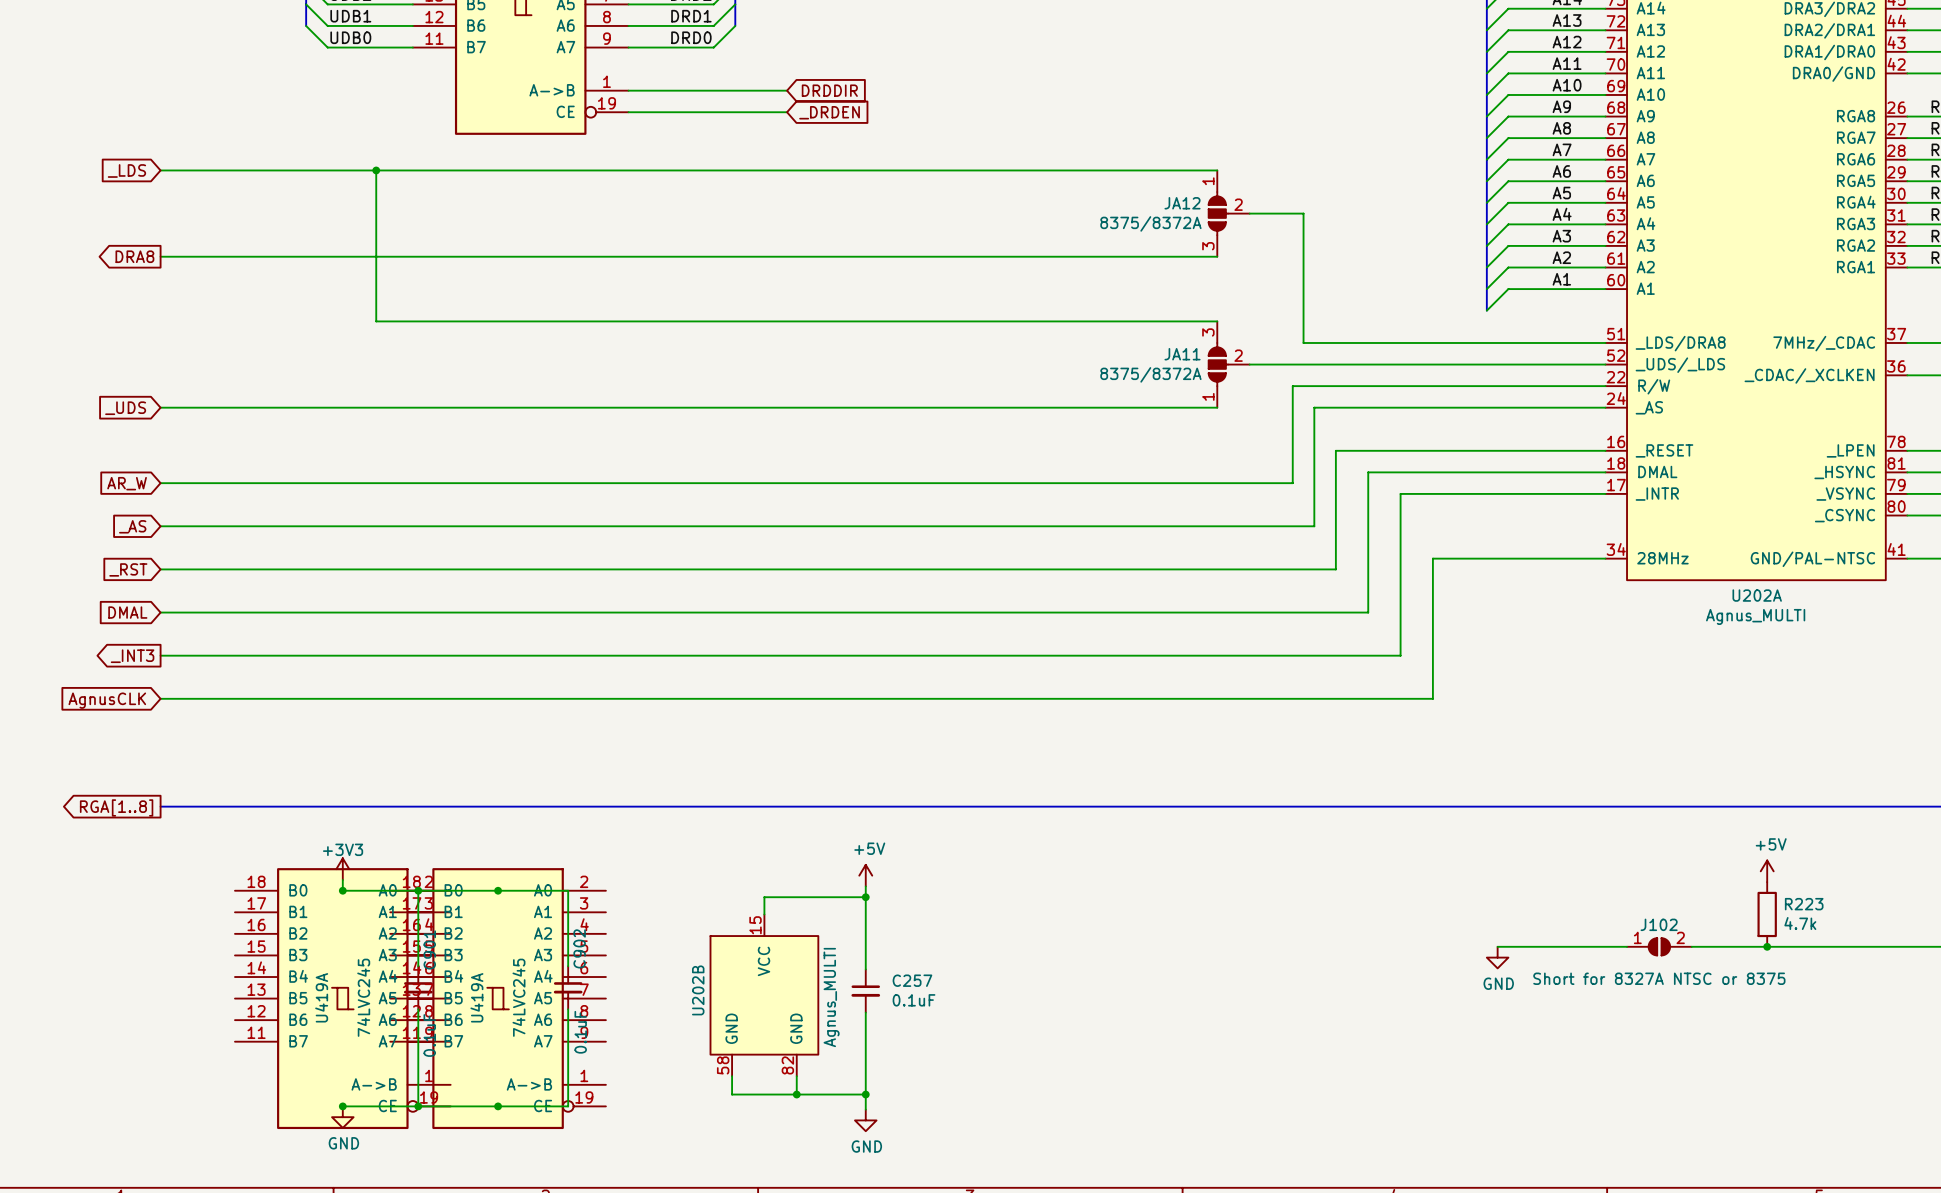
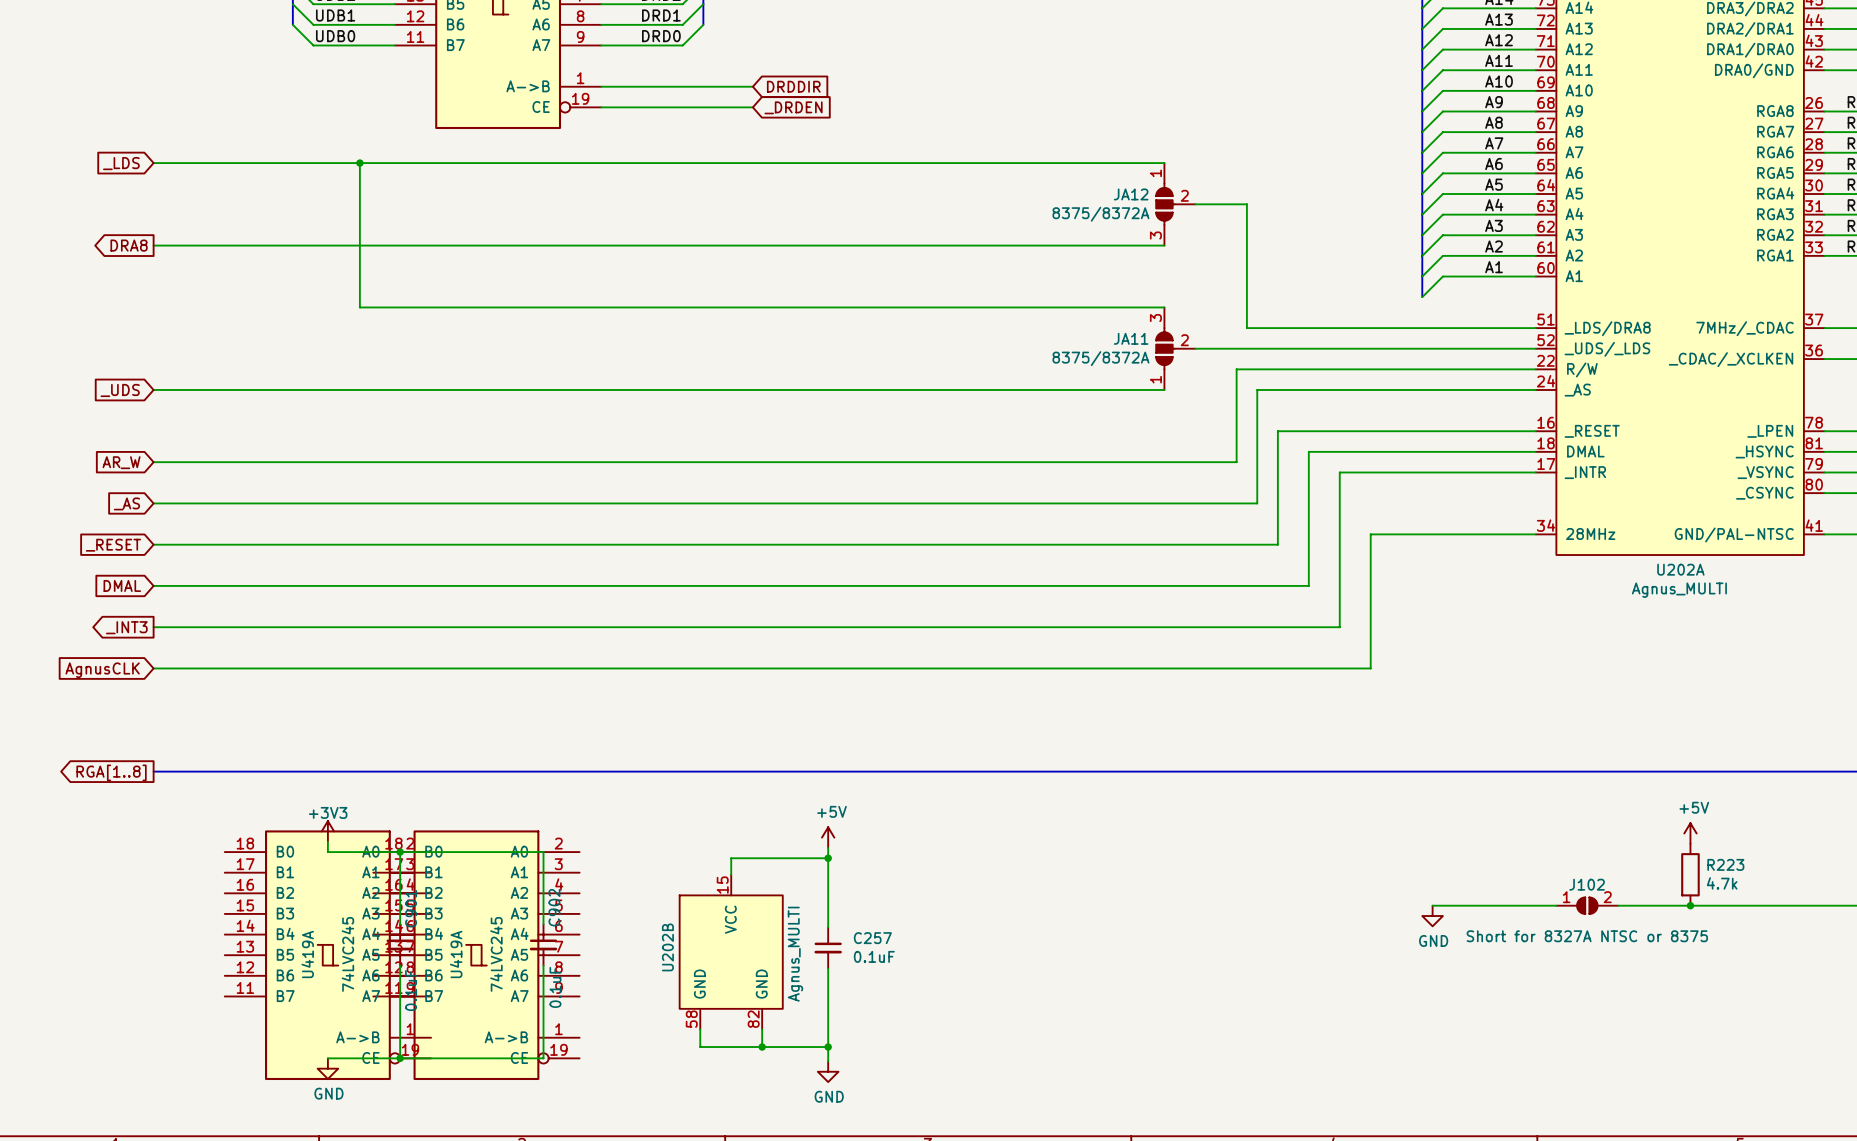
global label: _RST (128, 569) -> _RESET (113, 545)
junction: (342, 890) -> none
junction: (498, 890) -> none
junction: (342, 1106) -> none
junction: (498, 1106) -> none

